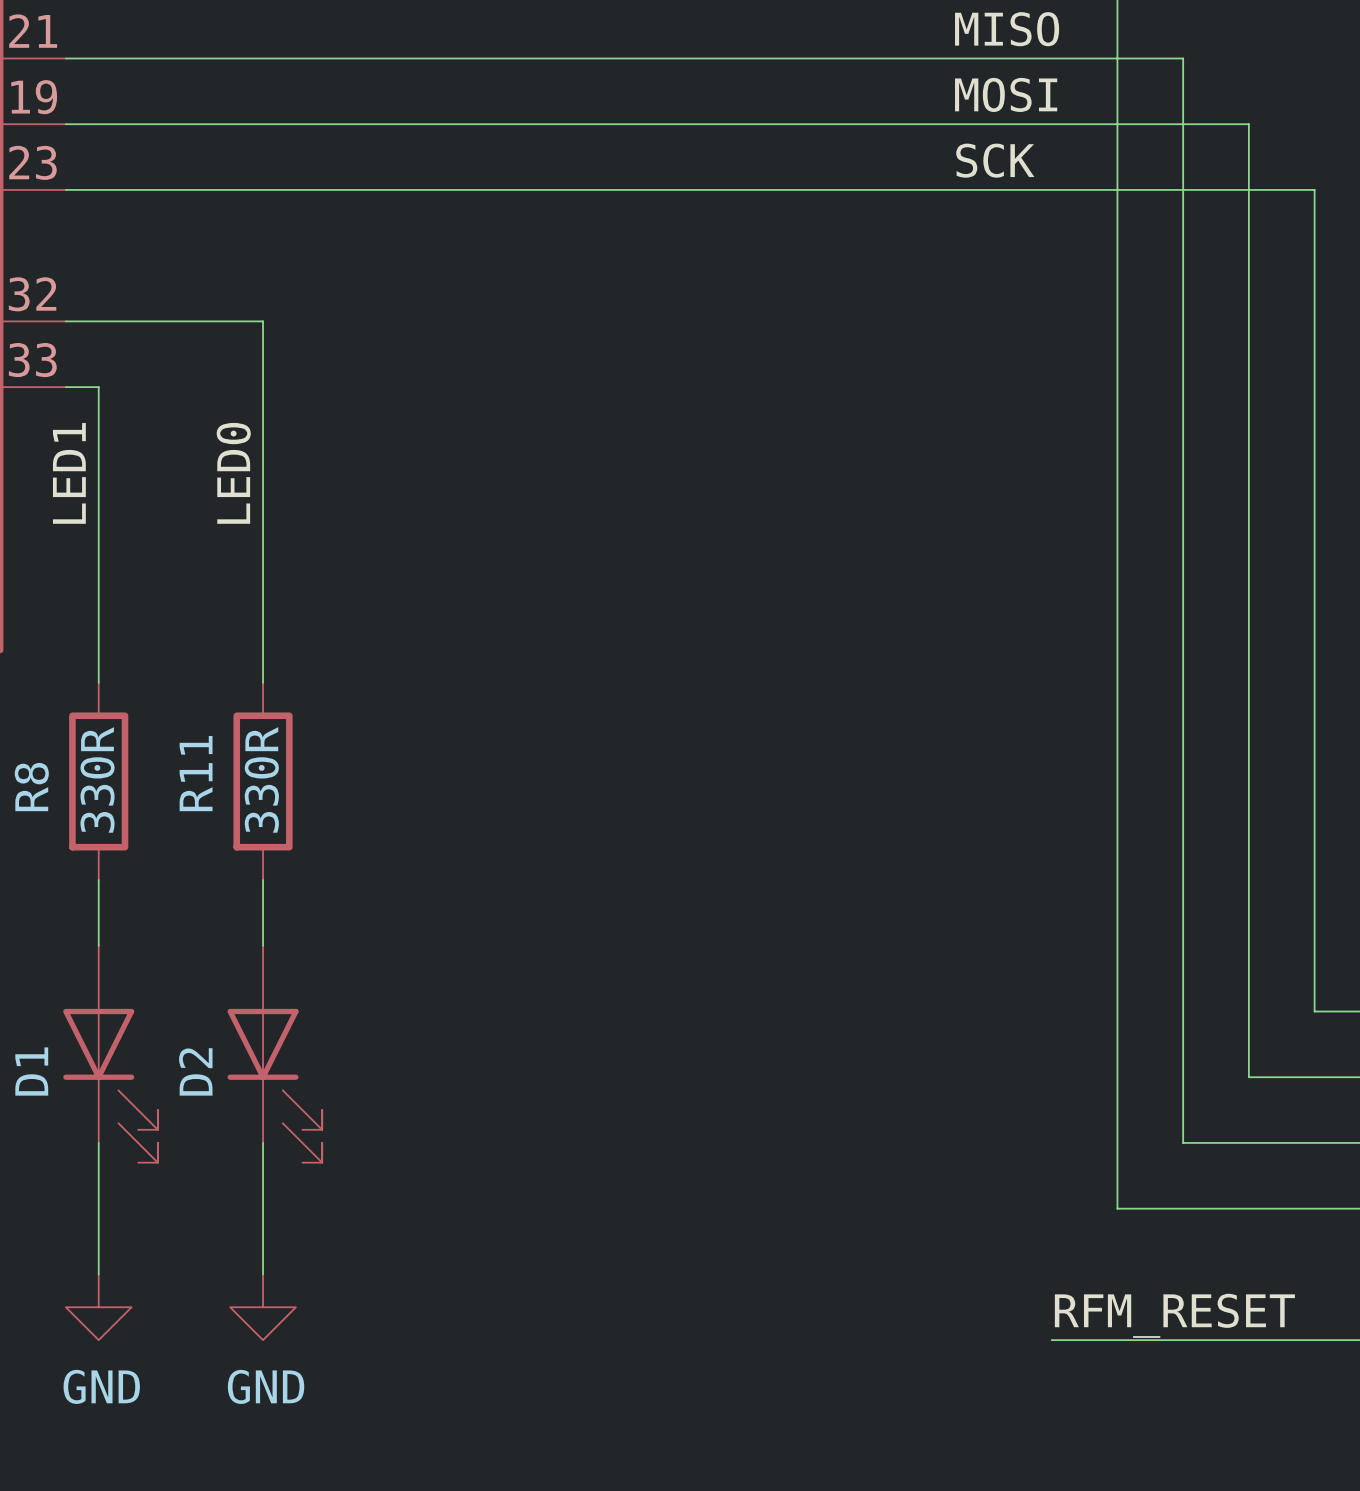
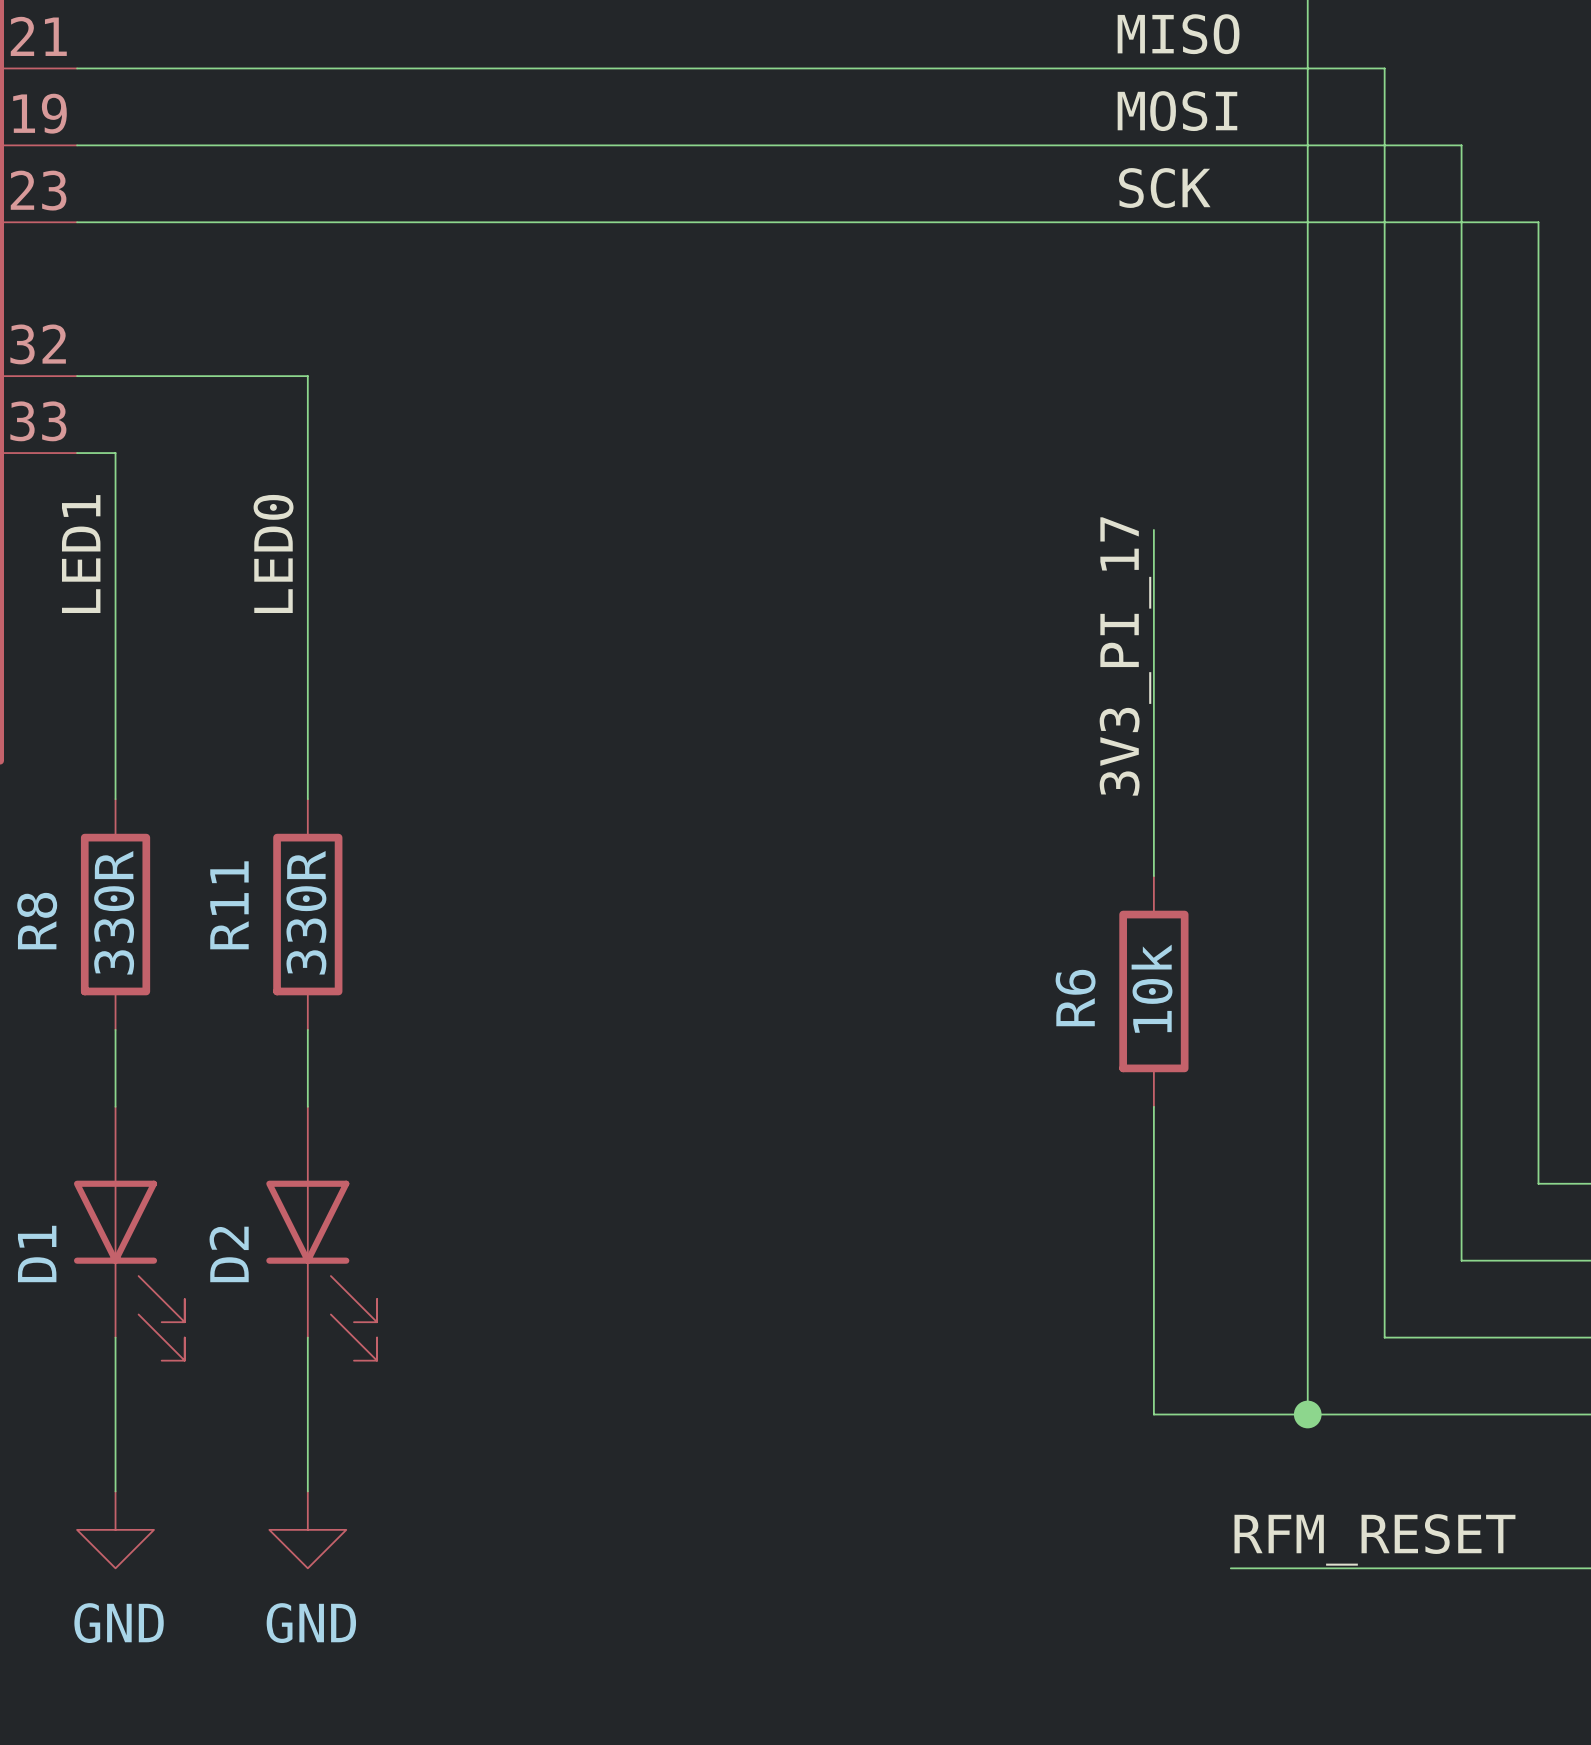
wire: none -> (1153, 529) (1153, 876)
label: none -> 3V3_PI_17 (1125, 656)
R6: none -> 10k (1153, 991)
wire: none -> (1153, 1106) (1153, 1414) (1307, 1414)
junction: none -> (1307, 1414)

